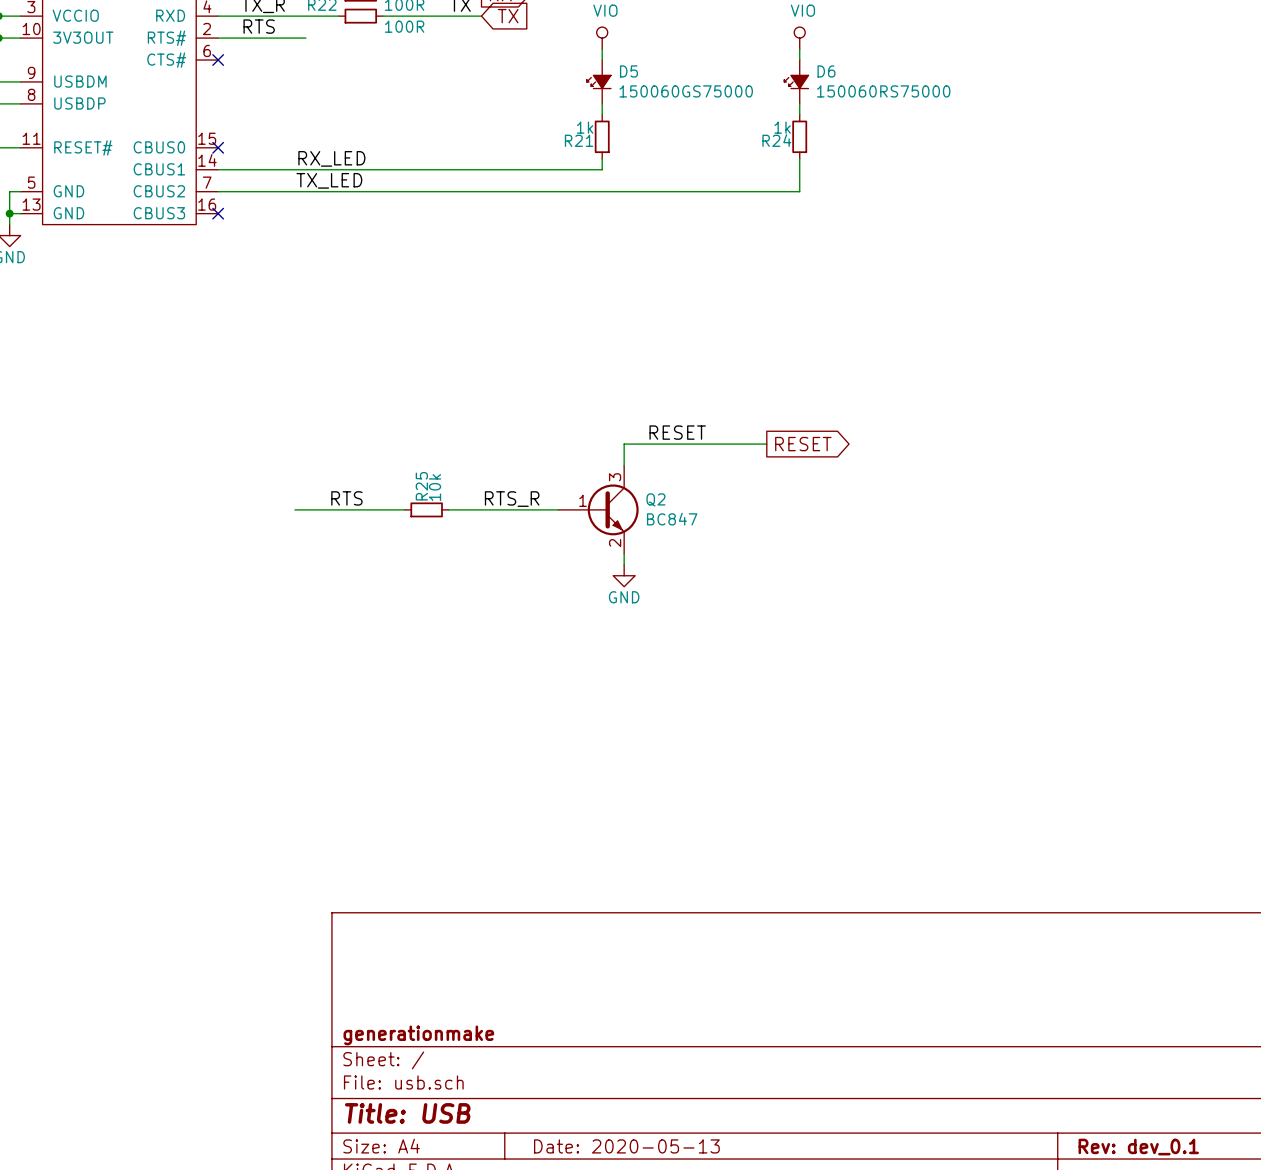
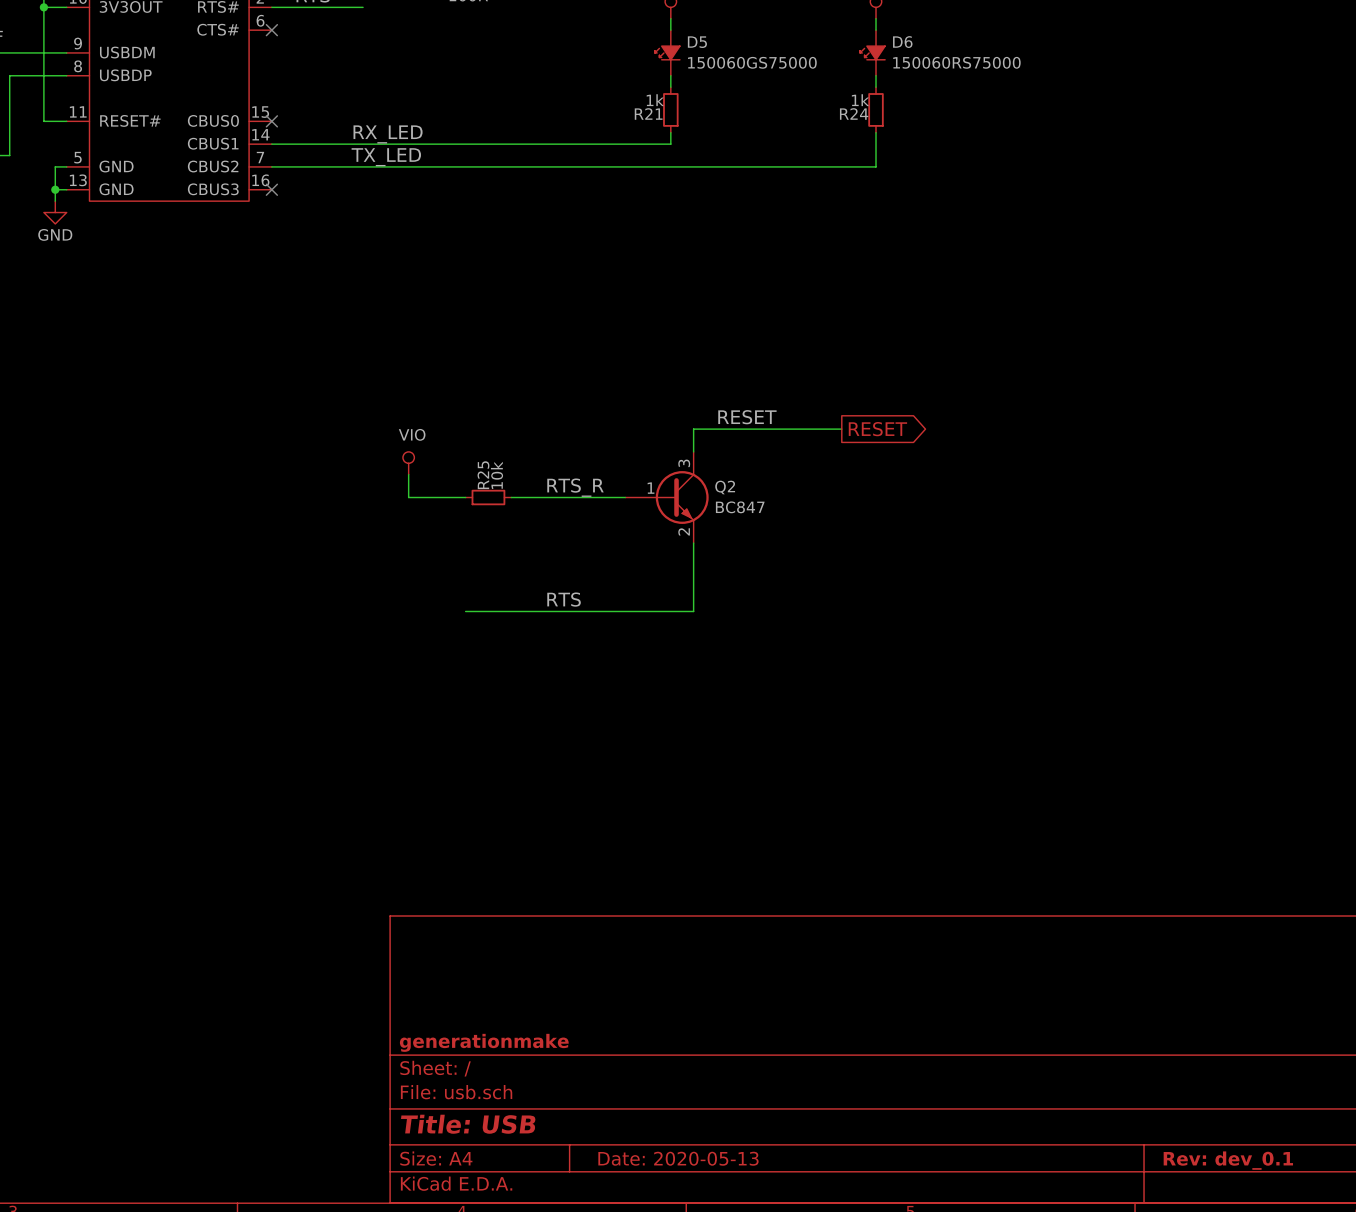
power symbol: none -> VIO (408, 463)
label position: RTS (346, 498) -> RTS (564, 599)
wire: (294, 509) (349, 509) -> (408, 474) (408, 497)
wire: none -> (693, 554) (693, 611) (465, 611)
power symbol: GND (624, 575) -> none

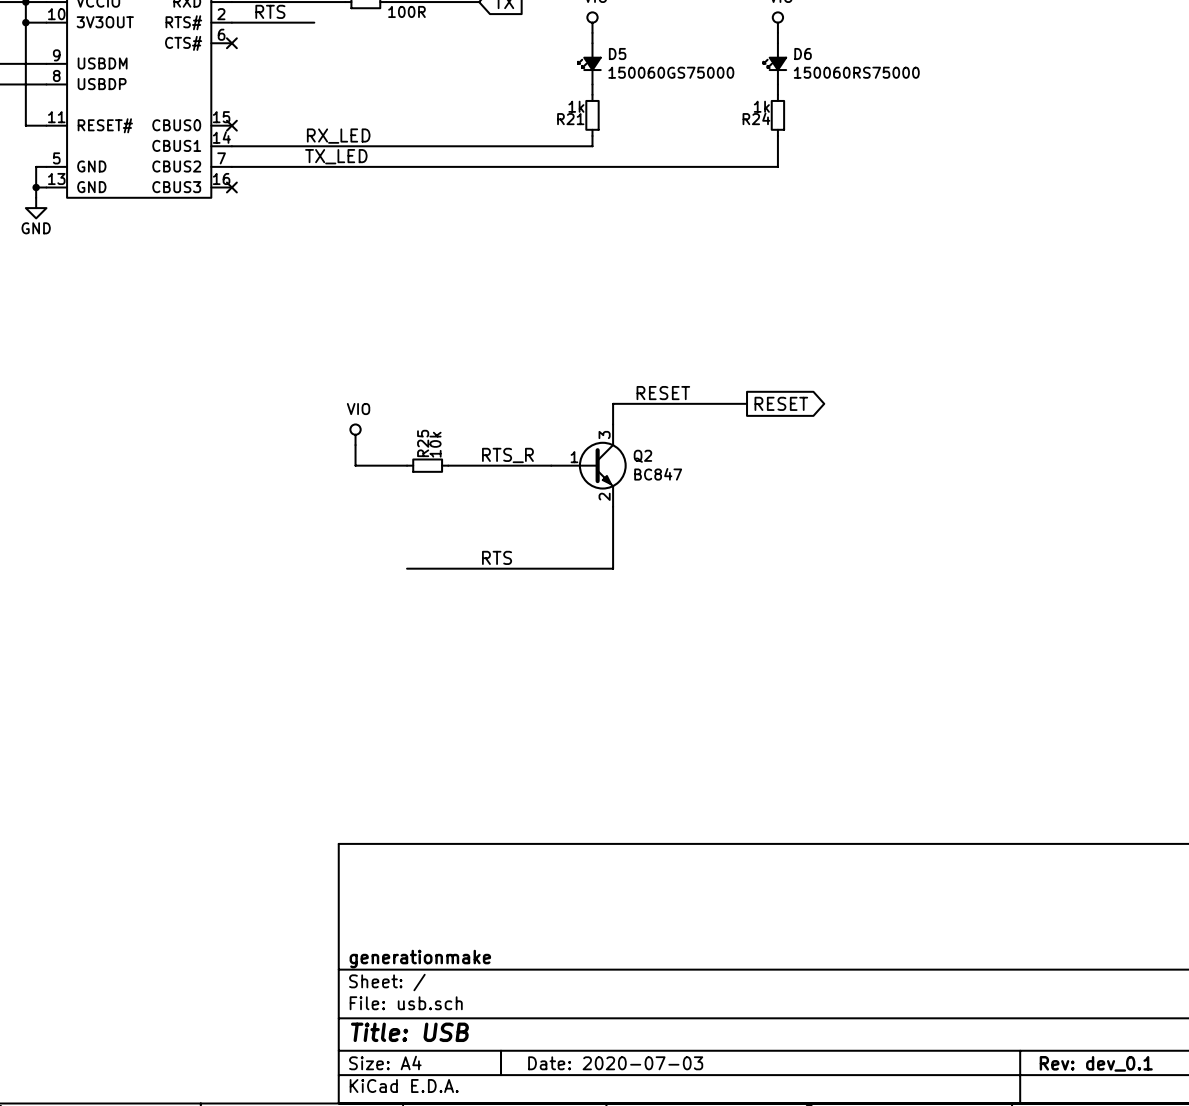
title block: Date: 2020-05-13 (678, 1158) -> Date: 2020-07-03 (615, 1063)

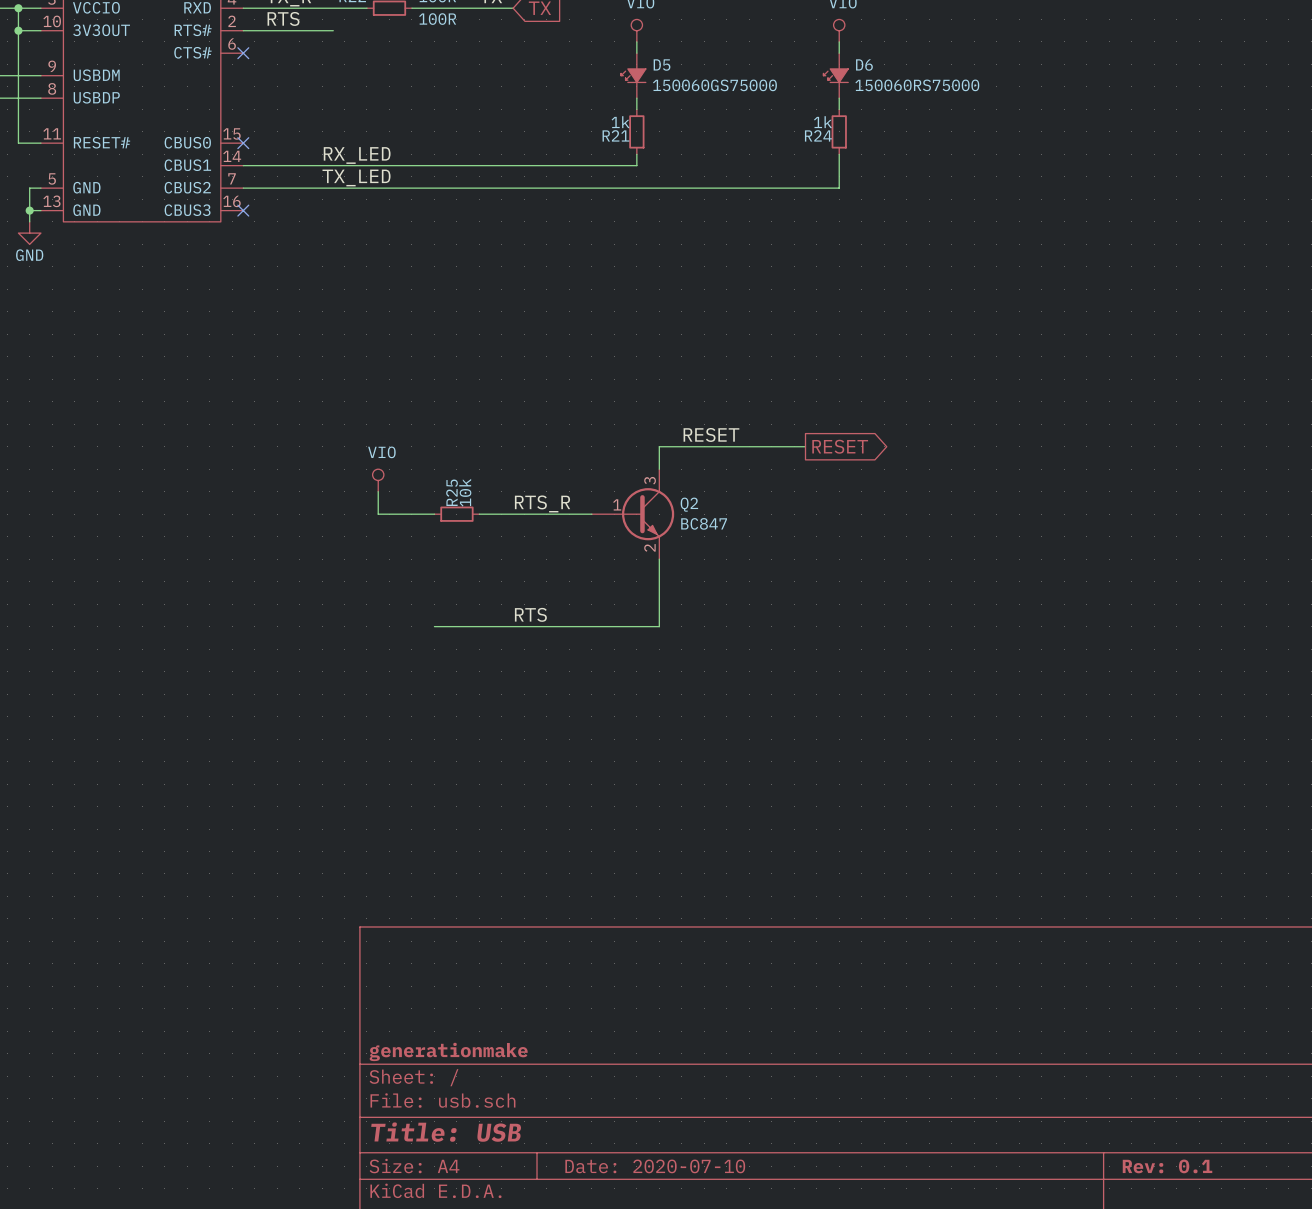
title block: Date: 2020-07-03 (615, 1063) -> Date: 2020-07-10 (655, 1166)
title block: Rev: dev_0.1 (1096, 1063) -> Rev: 0.1 (1167, 1166)

